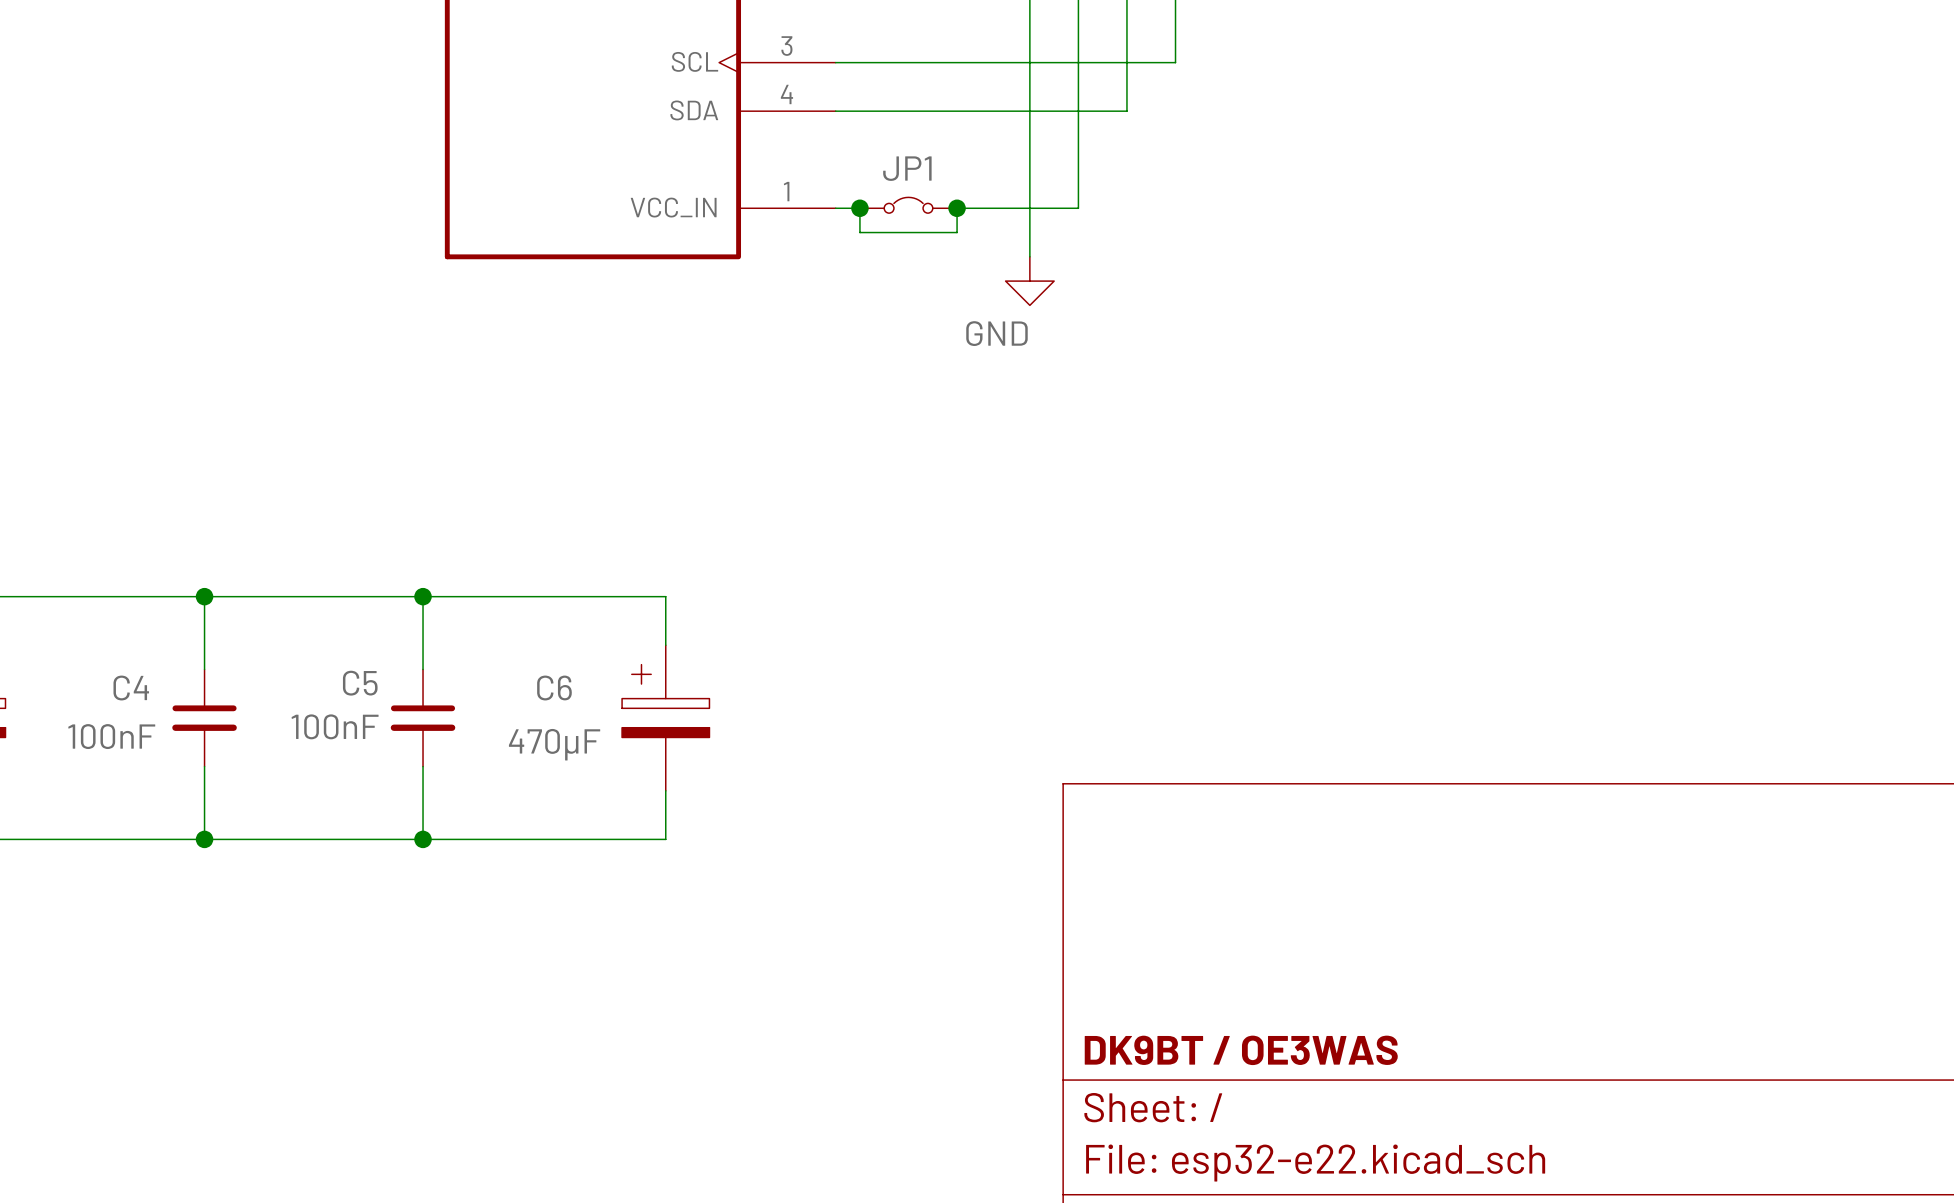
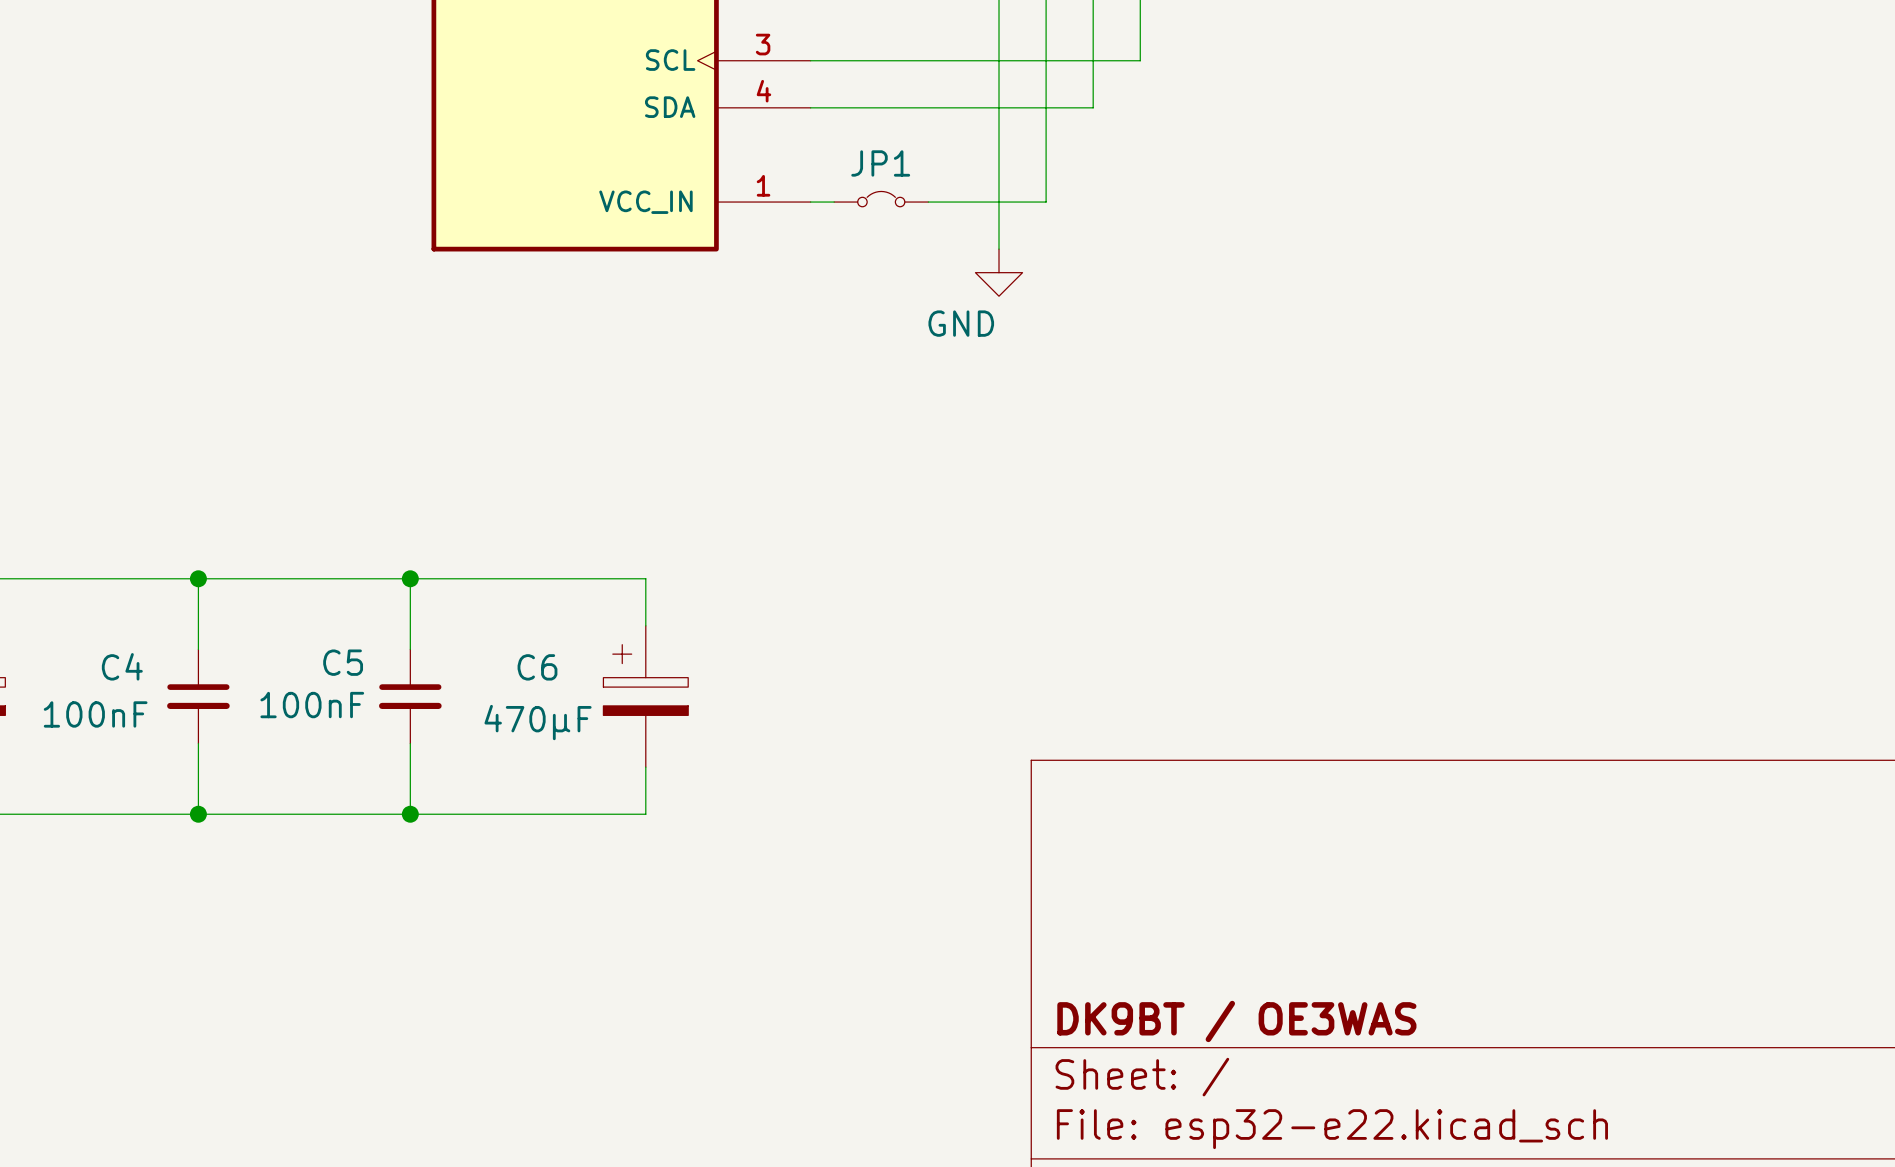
wire: (859, 208) (859, 232) (957, 232) (957, 208) -> none
junction: (859, 208) -> none
junction: (957, 208) -> none

